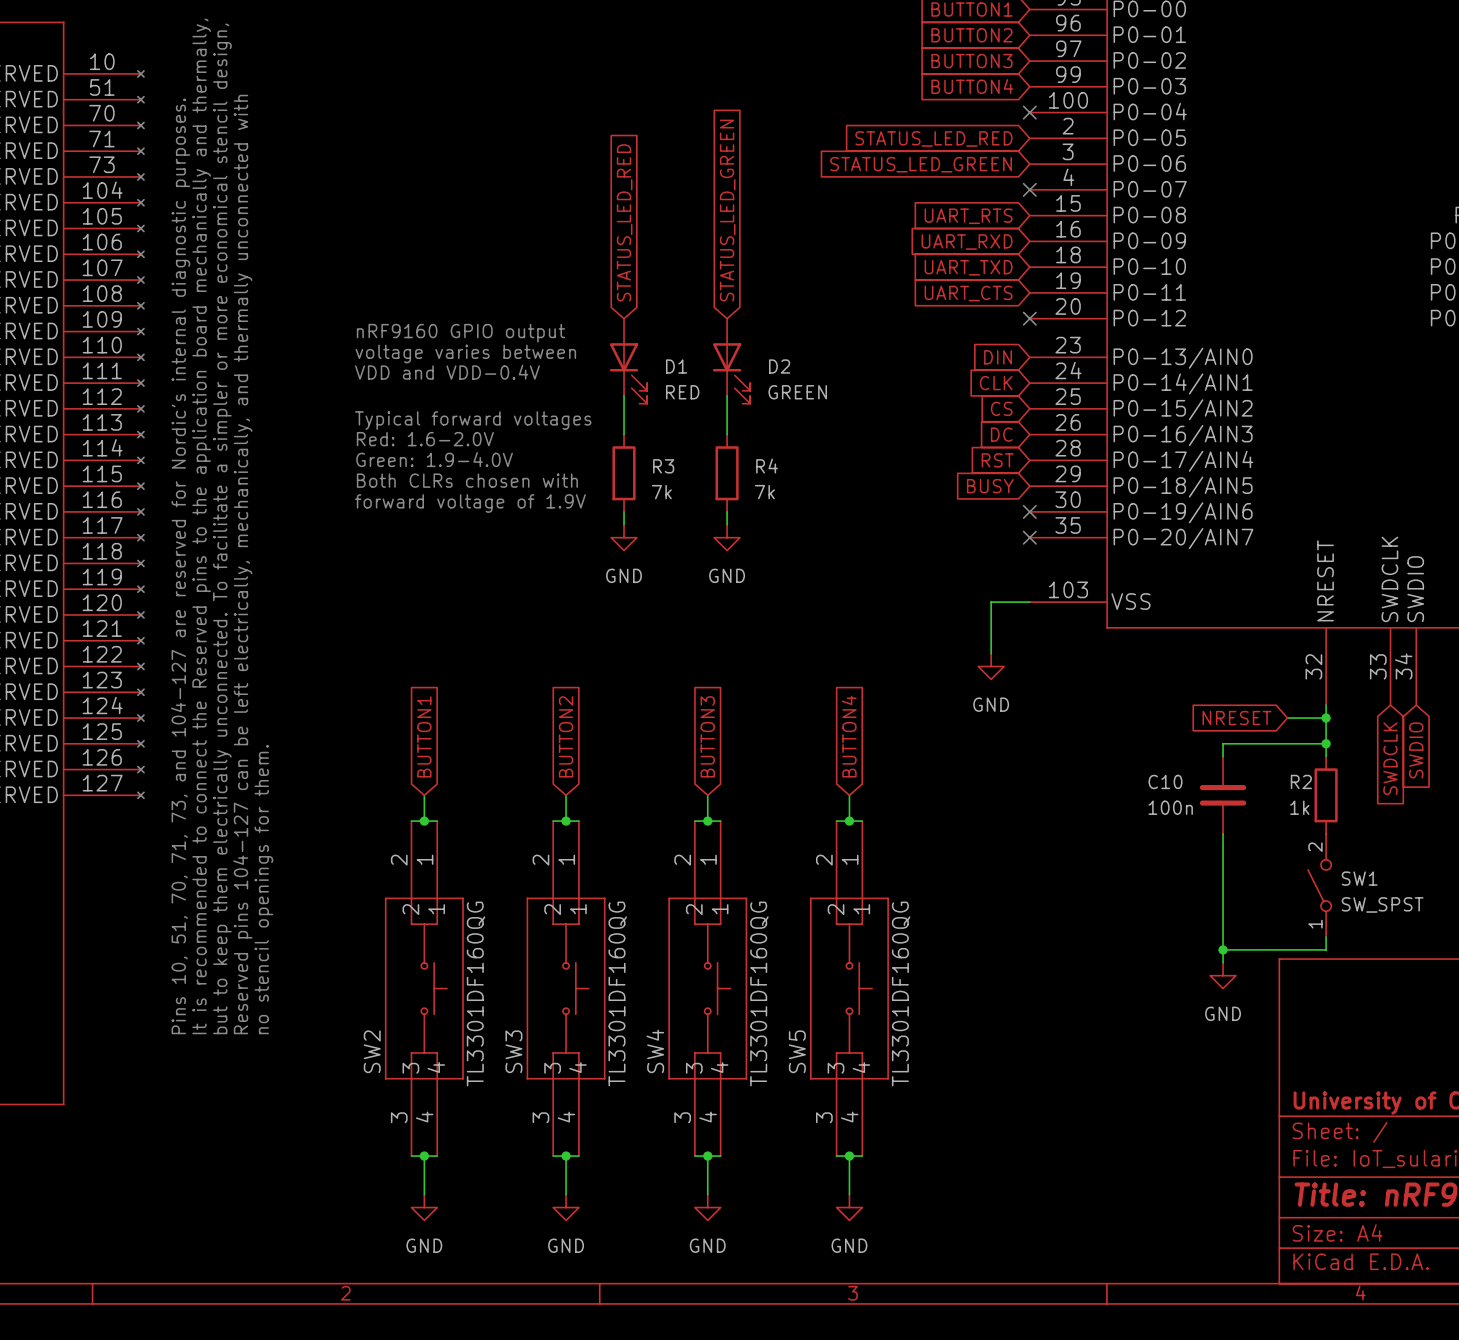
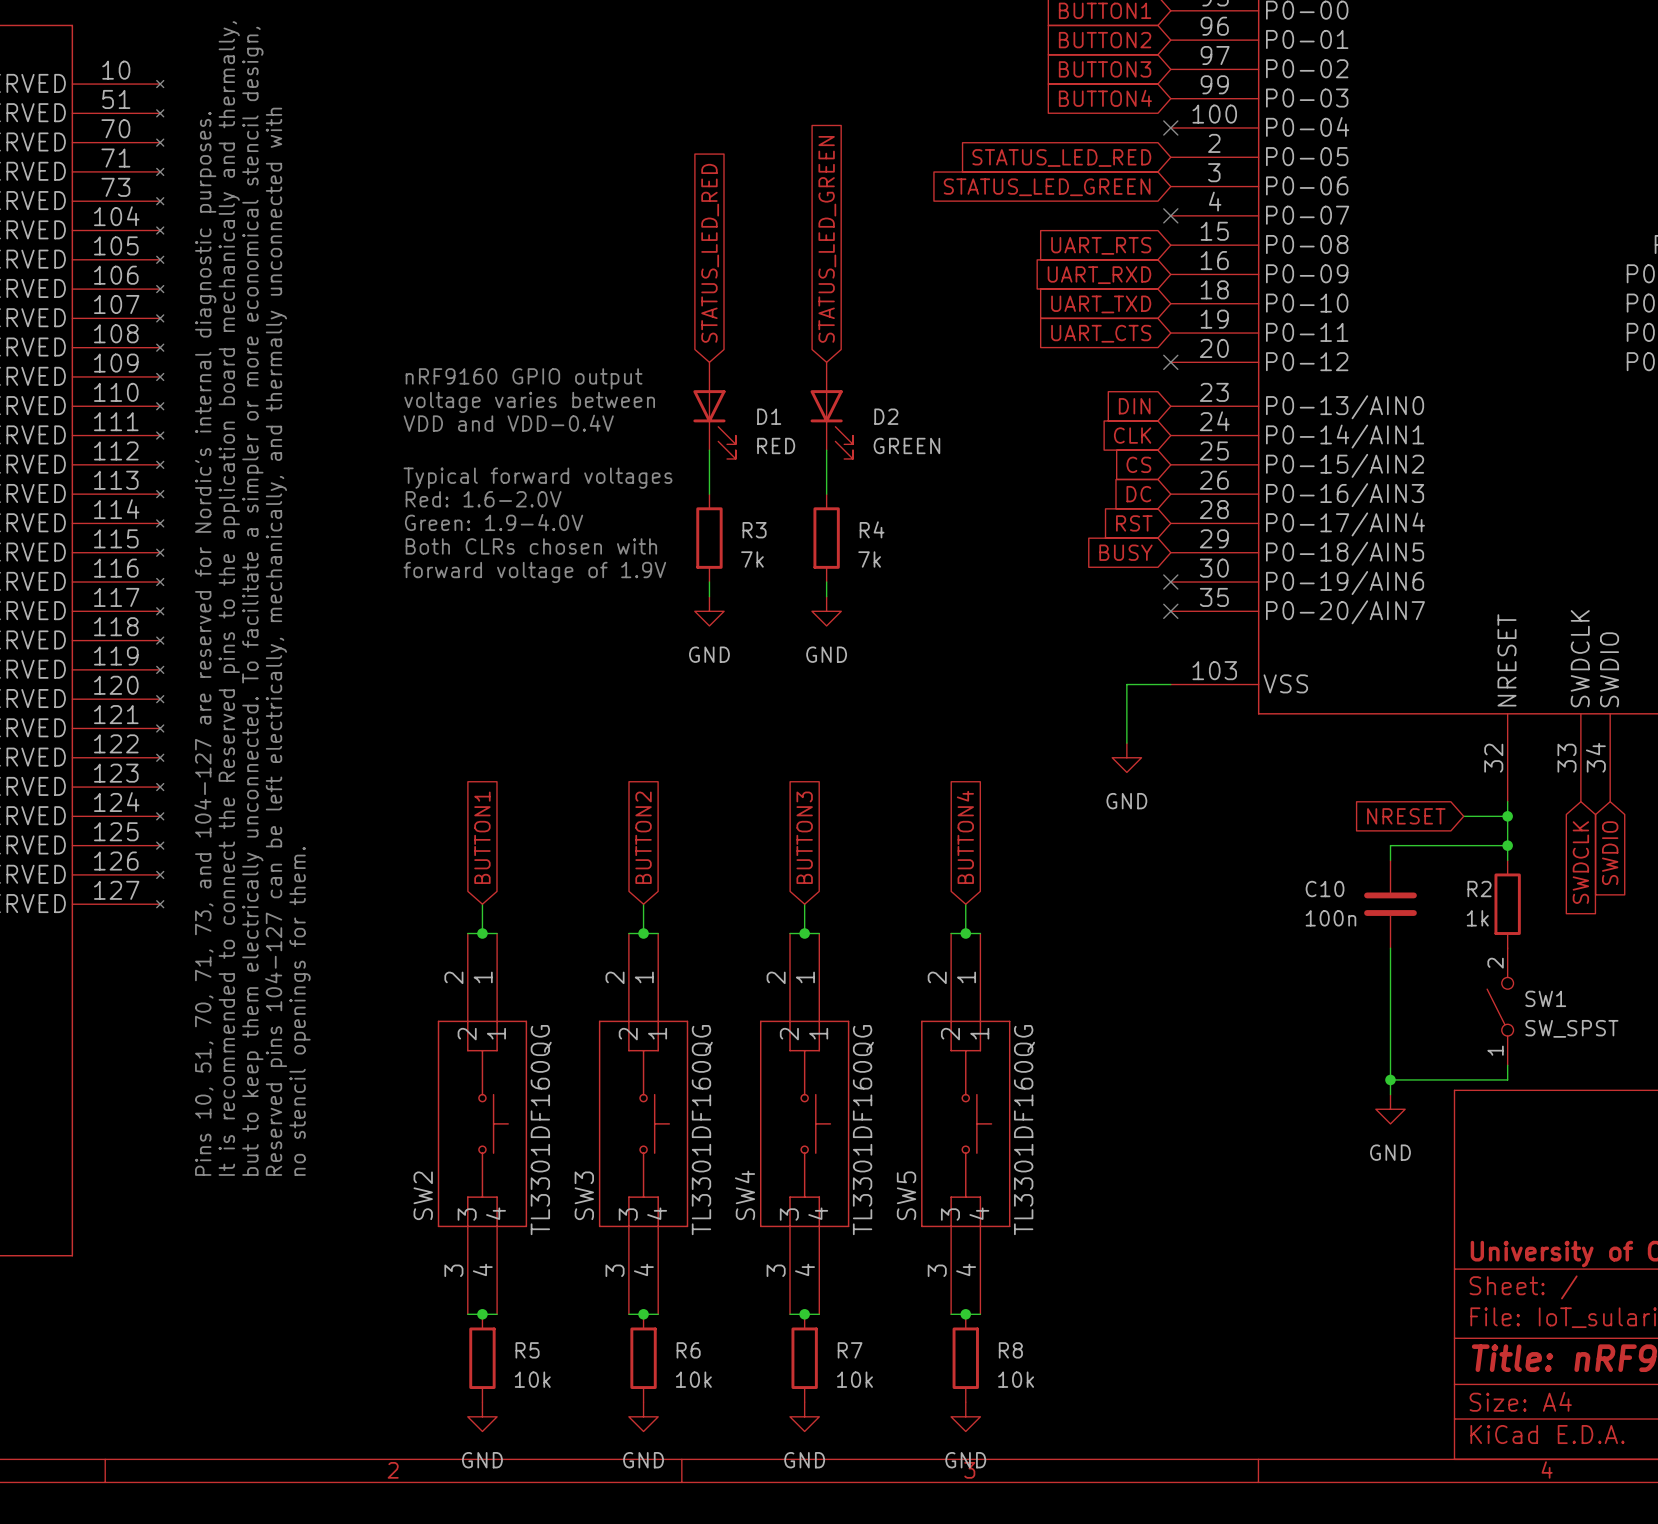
wire: (424, 1156) (424, 1194) -> none
wire: (566, 1156) (566, 1194) -> none
wire: (707, 1156) (707, 1194) -> none
wire: (849, 1156) (849, 1194) -> none
R5: none -> 10k (482, 1358)
R6: none -> 10k (643, 1358)
R7: none -> 10k (804, 1358)
R8: none -> 10k (965, 1358)
power symbol position: GND (424, 1207) -> GND (482, 1416)
power symbol position: GND (566, 1207) -> GND (643, 1416)
power symbol position: GND (707, 1207) -> GND (804, 1416)
power symbol position: GND (849, 1207) -> GND (965, 1416)

